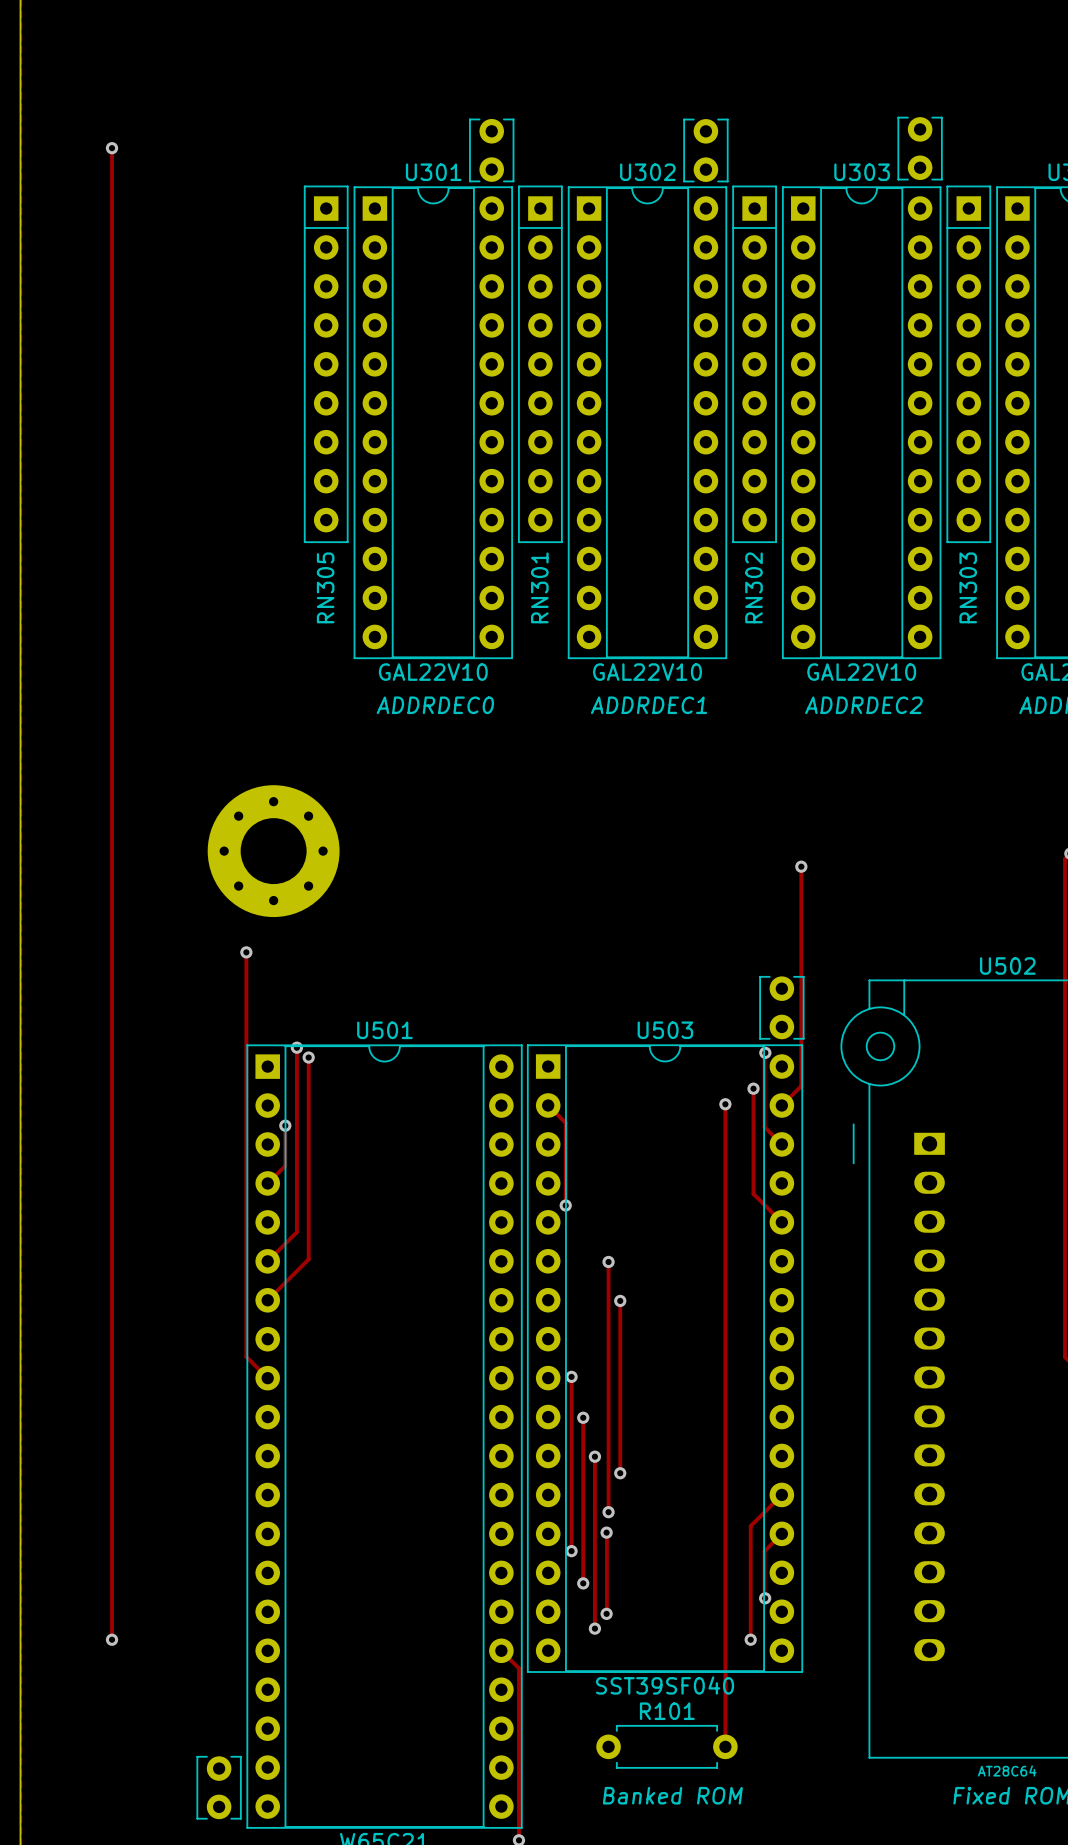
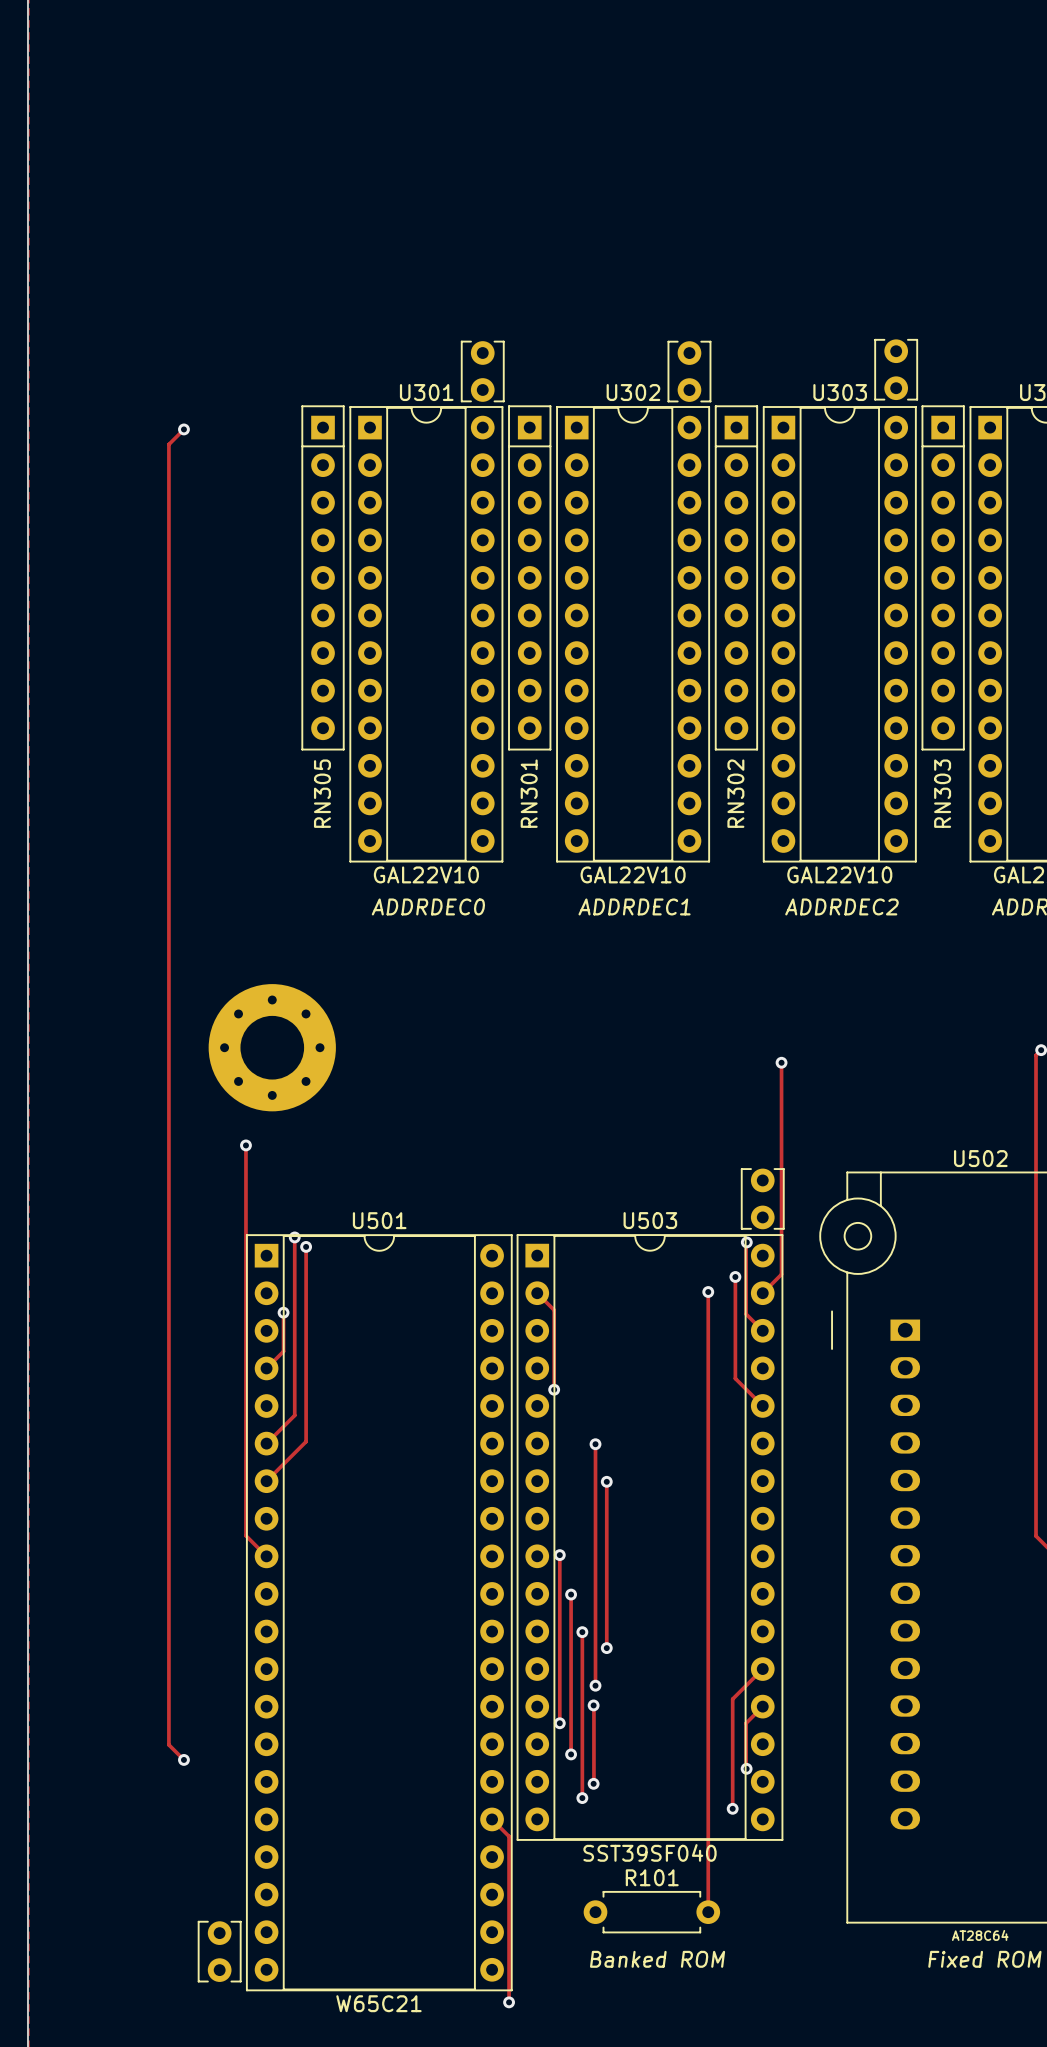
track: (112, 148) (112, 1639) -> none
via: (112, 148) -> none
track: none -> (183, 429) (168, 444) (168, 1744) (183, 1759)
via: none -> (183, 429)
via position: (112, 1639) -> (183, 1759)

